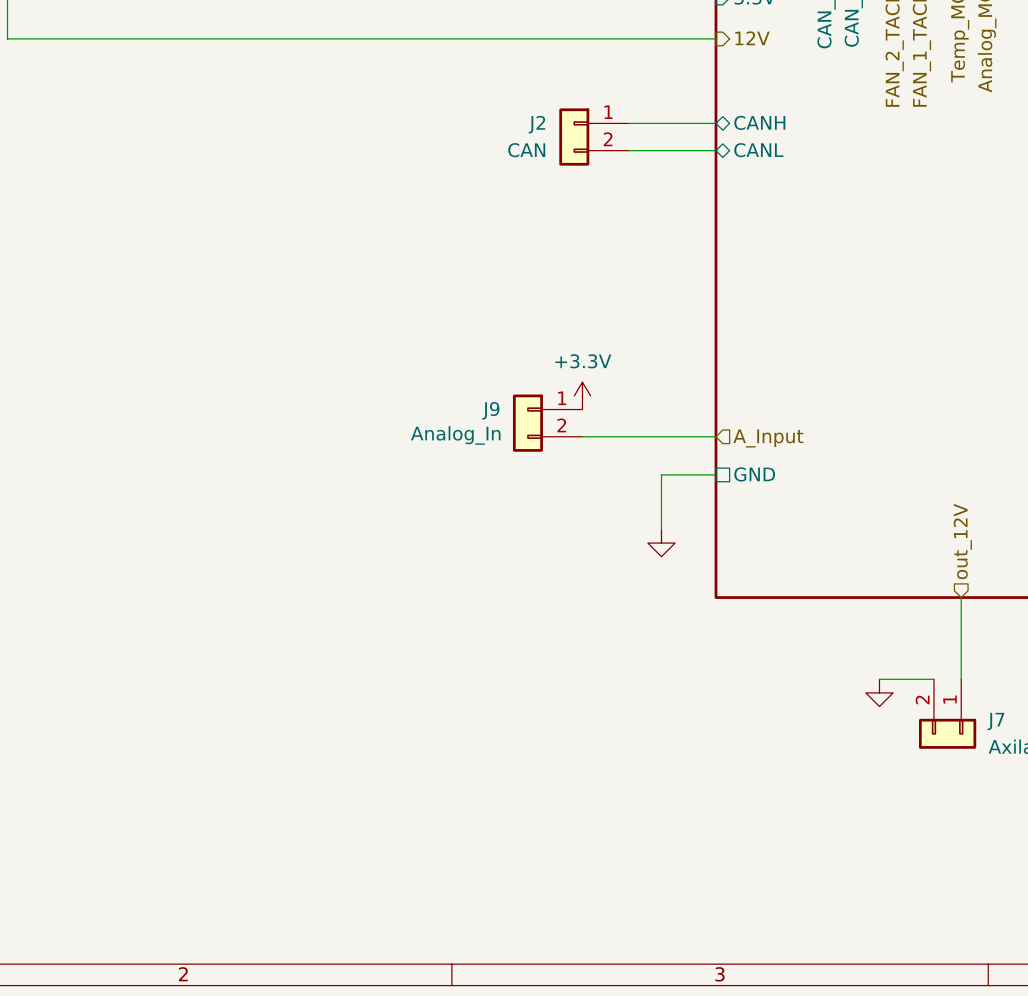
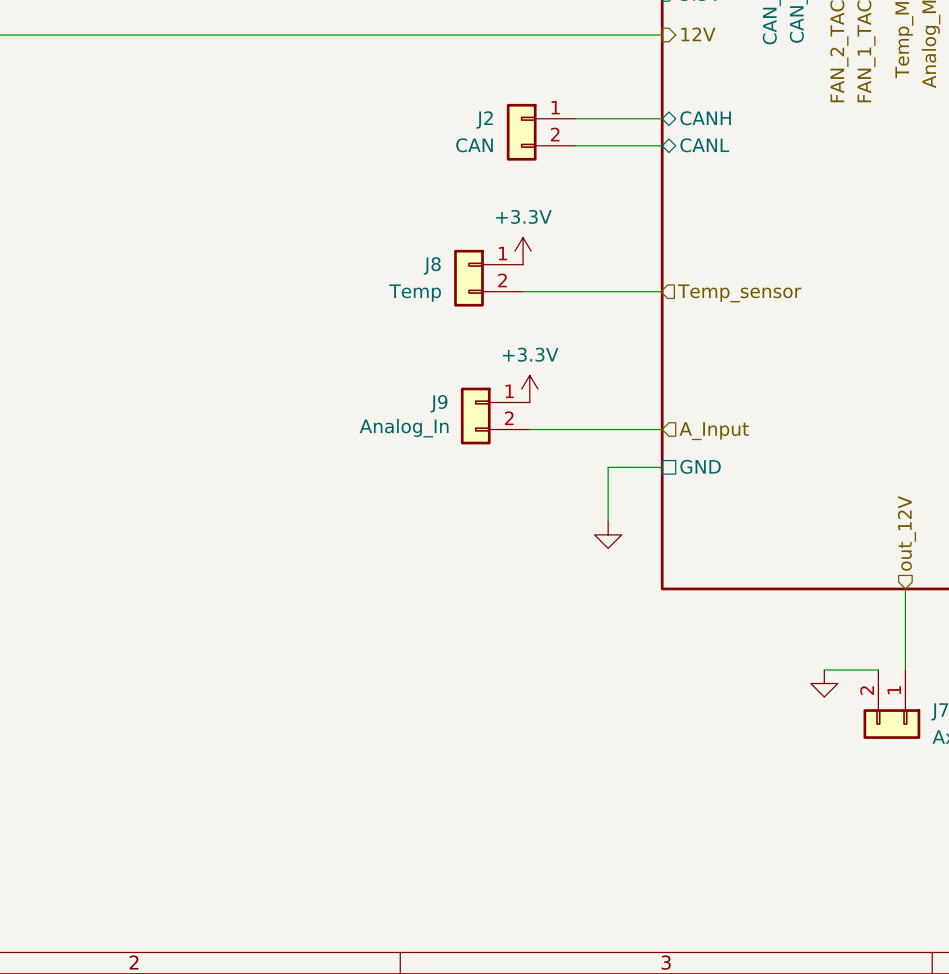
power symbol: none -> +3.3V (523, 251)
J8: none -> Temp (488, 278)
wire: none -> (523, 291) (660, 291)
hierarchical label: none -> Temp_sensor (739, 293)

